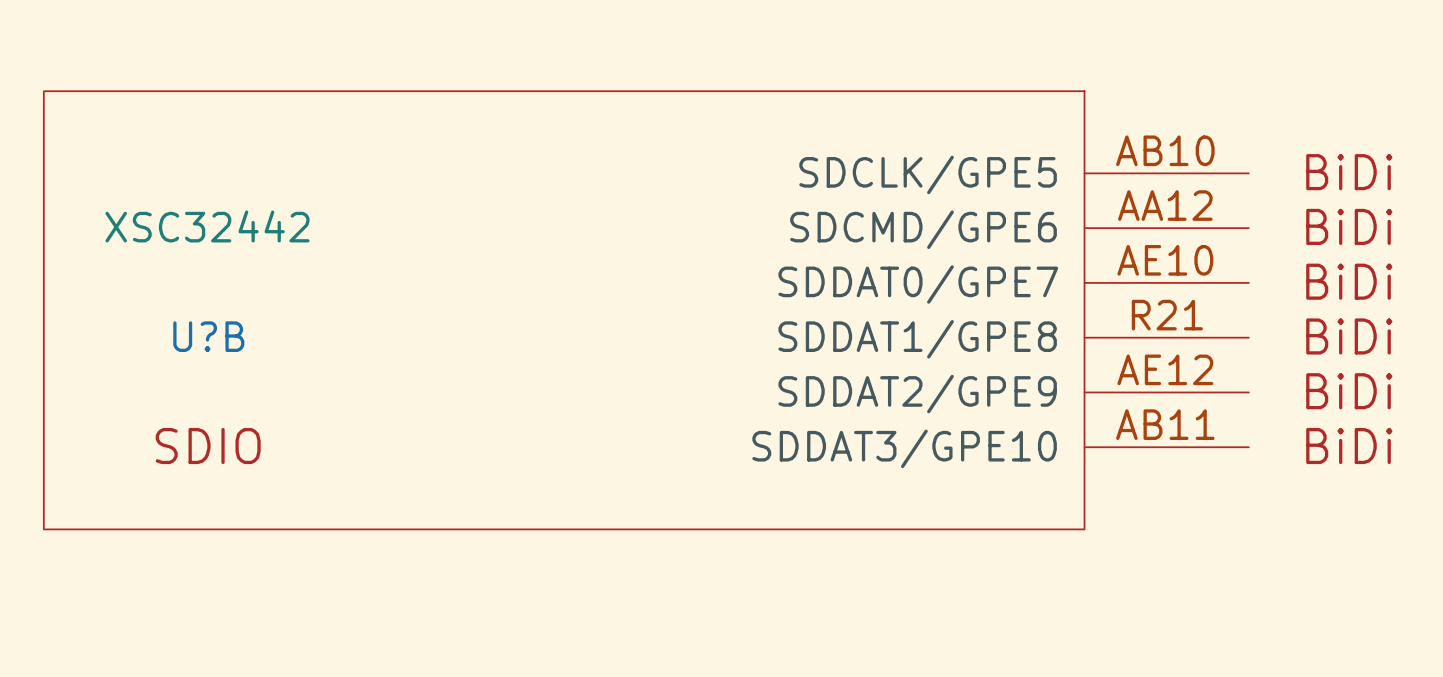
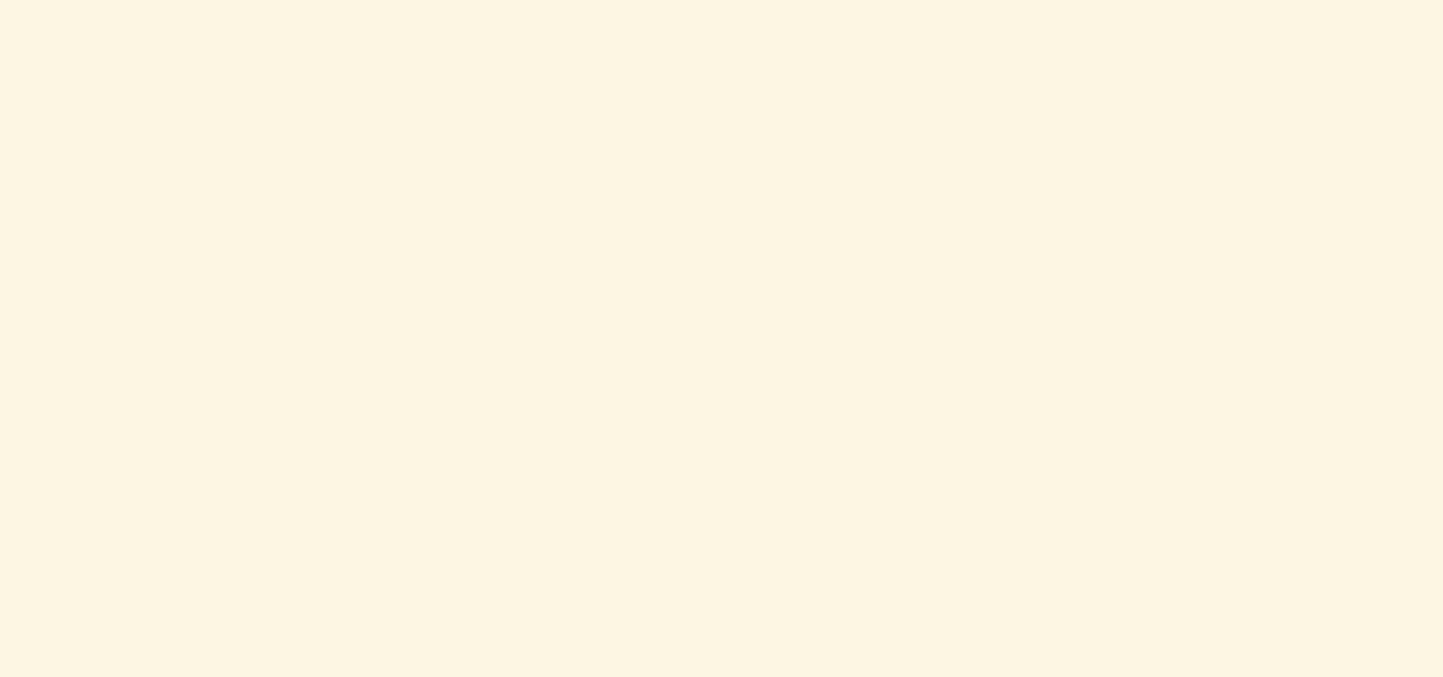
U?B: XSC32442 (646, 310) -> none

